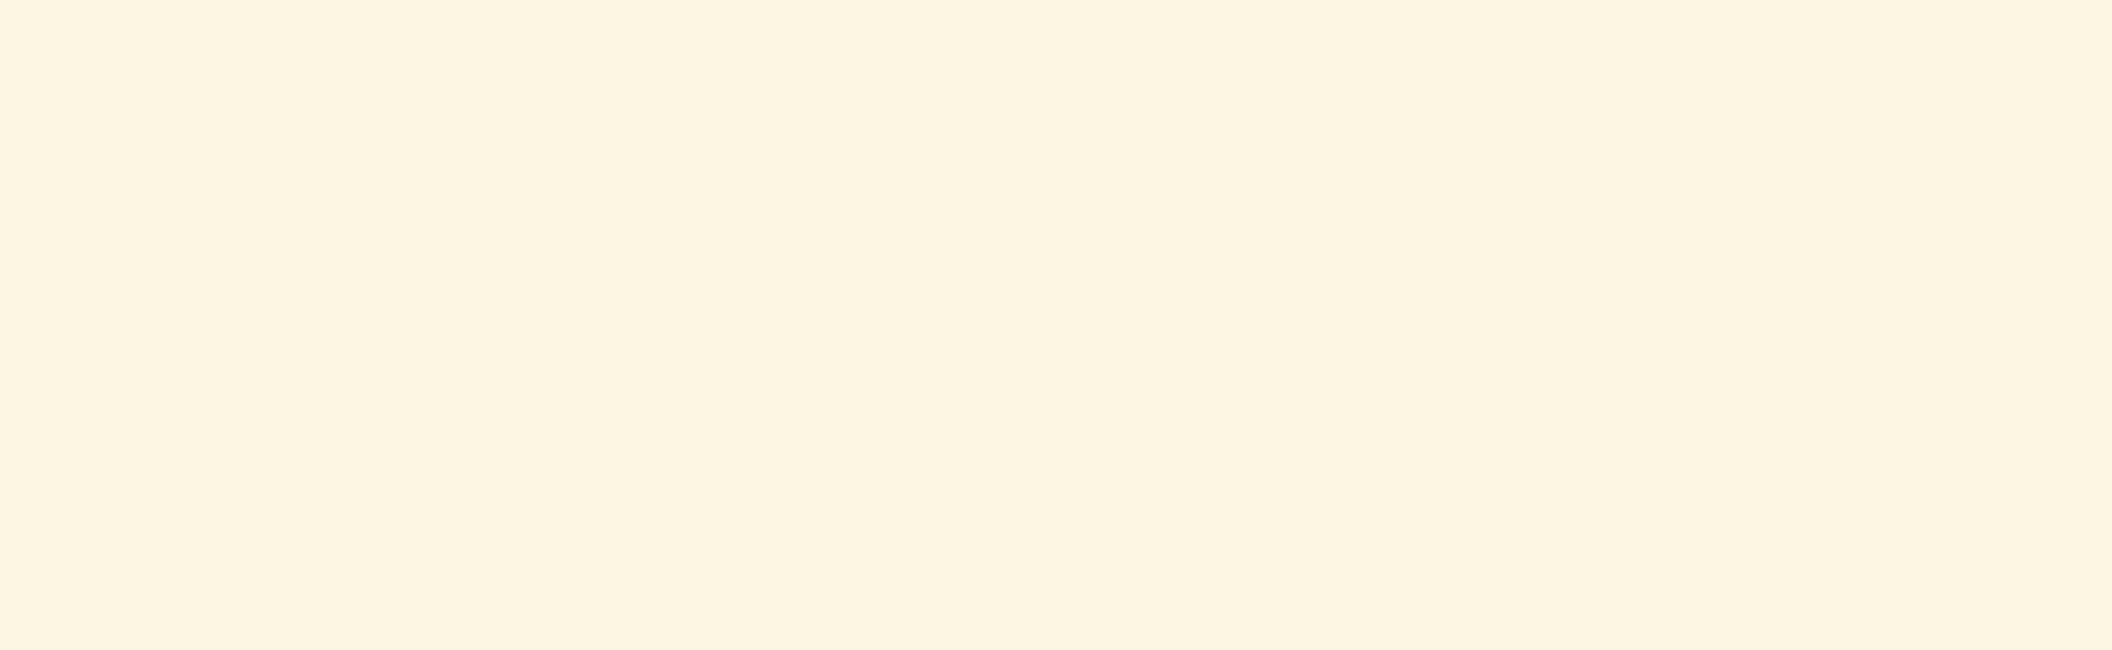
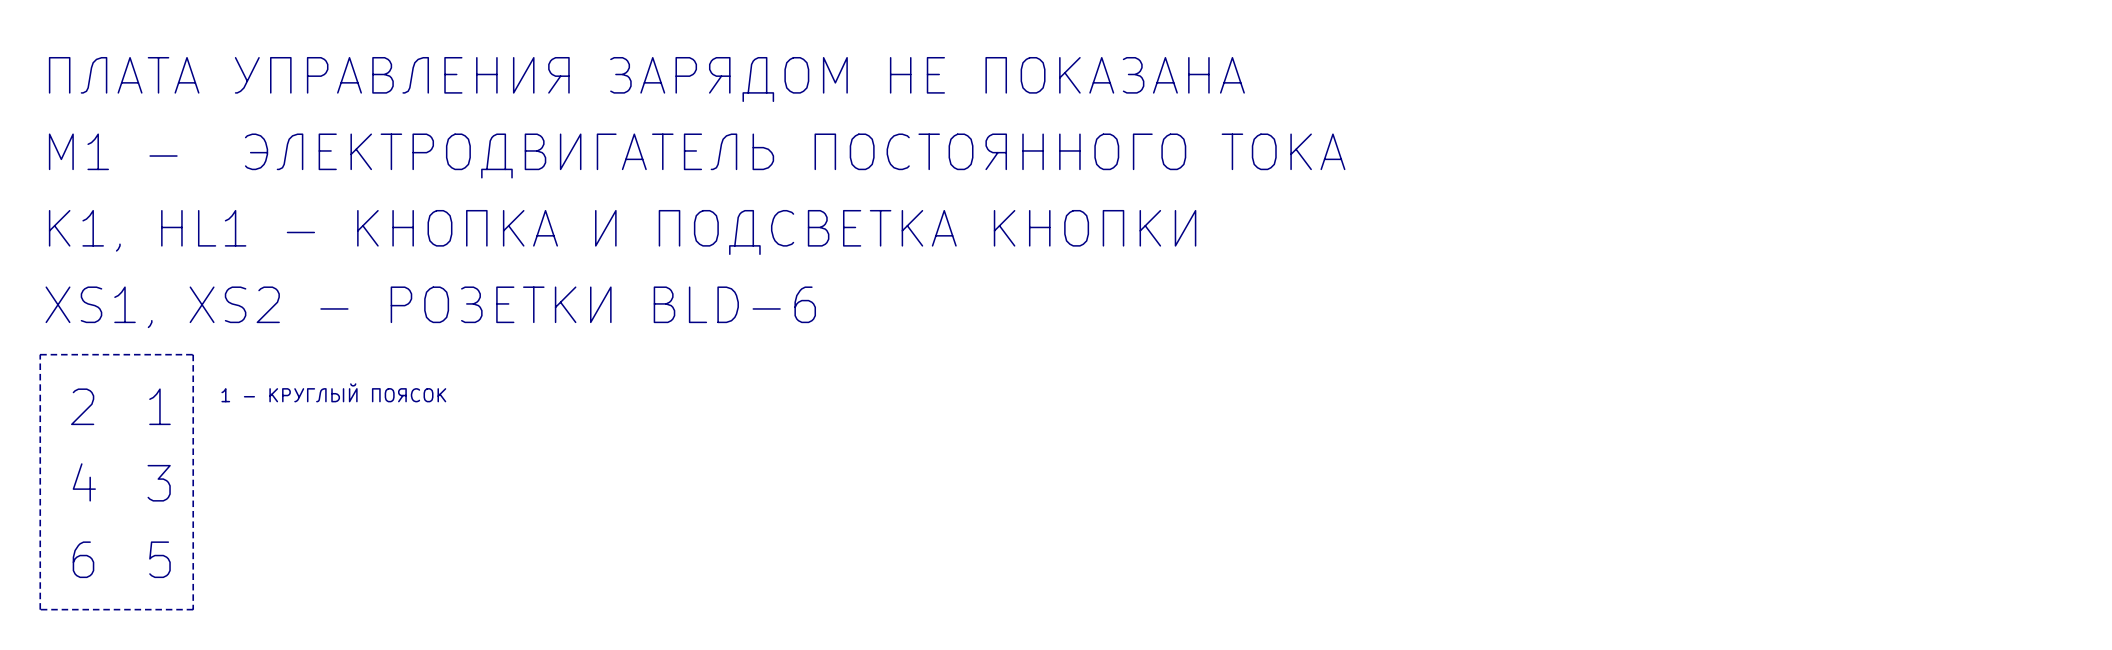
text: none -> ПЛАТА УПРАВЛЕНИЯ ЗАРЯДОМ НЕ ПОКАЗАНА (646, 79)
text: none -> M1 - ЭЛЕКТРОДВИГАТЕЛЬ ПОСТОЯННОГО ТОКА (697, 156)
text: none -> K1, HL1 - КНОПКА И ПОДСВЕТКА КНОПКИ (622, 232)
text: none -> XS1, XS2 - РОЗЕТКИ BLD-6 (430, 307)
line: none -> (40, 354) (193, 354) (193, 609) (40, 609) (40, 354)
text: none -> 1 - КРУГЛЫЙ ПОЯСОК (333, 392)
text: none -> 2 (82, 406)
text: none -> 1 (159, 406)
text: none -> 4 (84, 482)
text: none -> 3 (159, 483)
text: none -> 6 (83, 559)
text: none -> 5 (159, 559)

